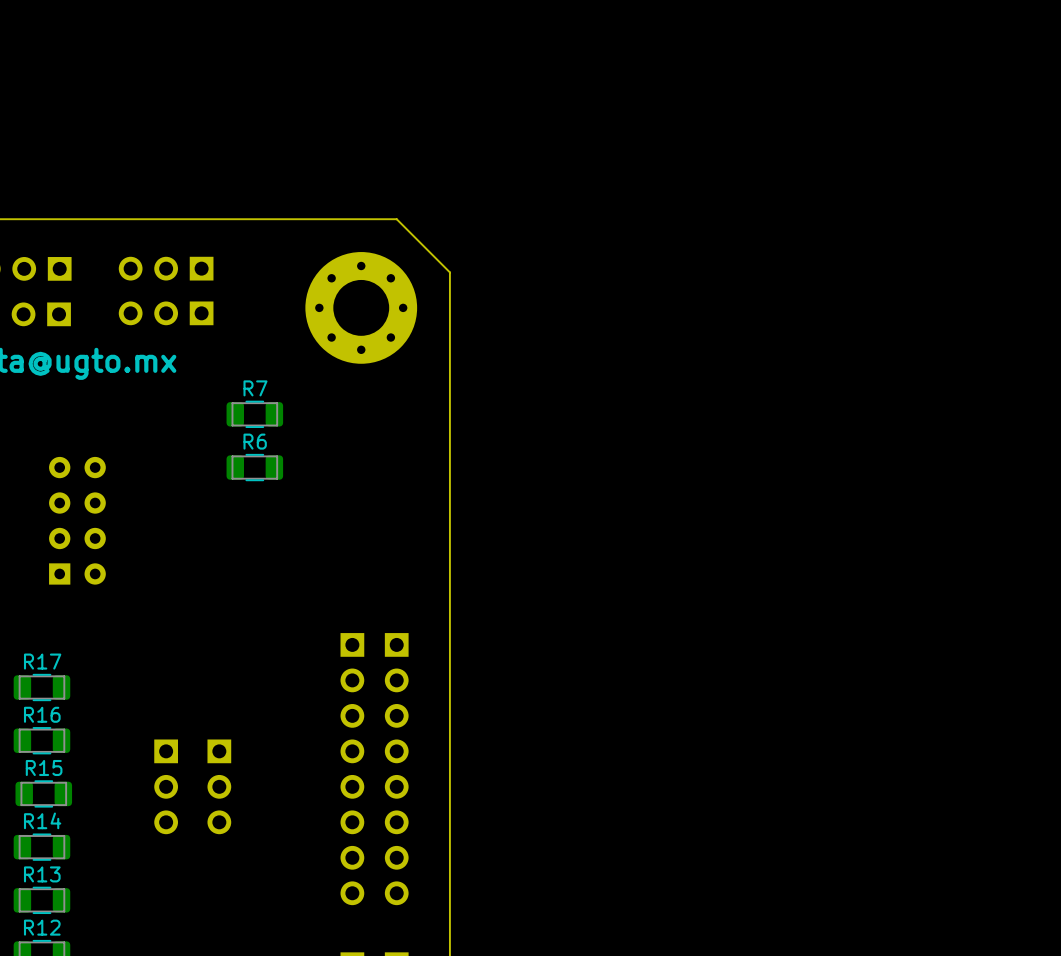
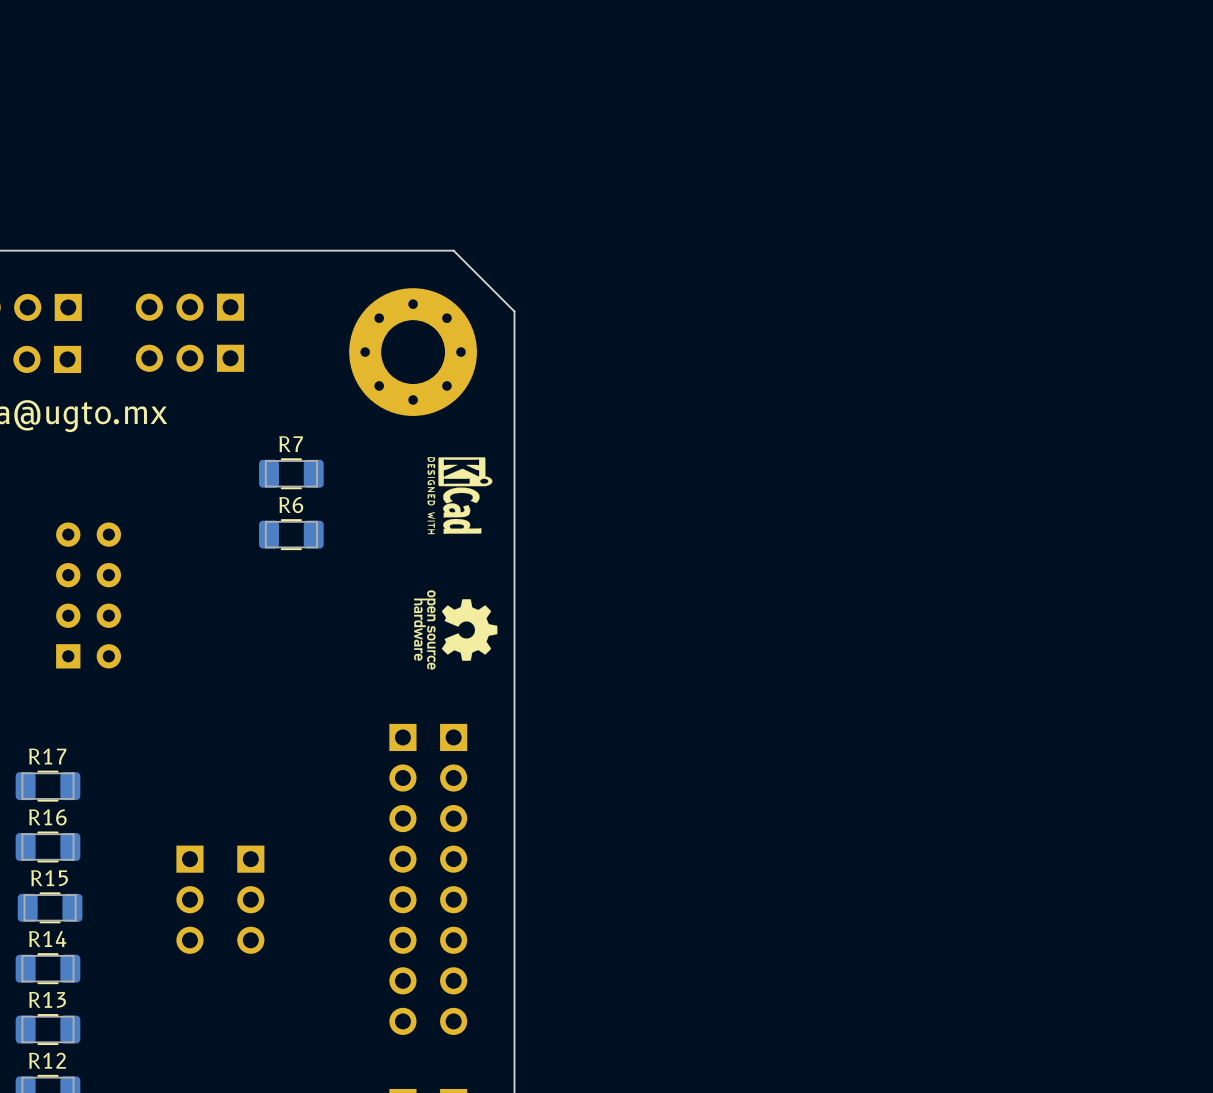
drawing: none -> [427, 457, 493, 535]
drawing: none -> [414, 590, 498, 670]

